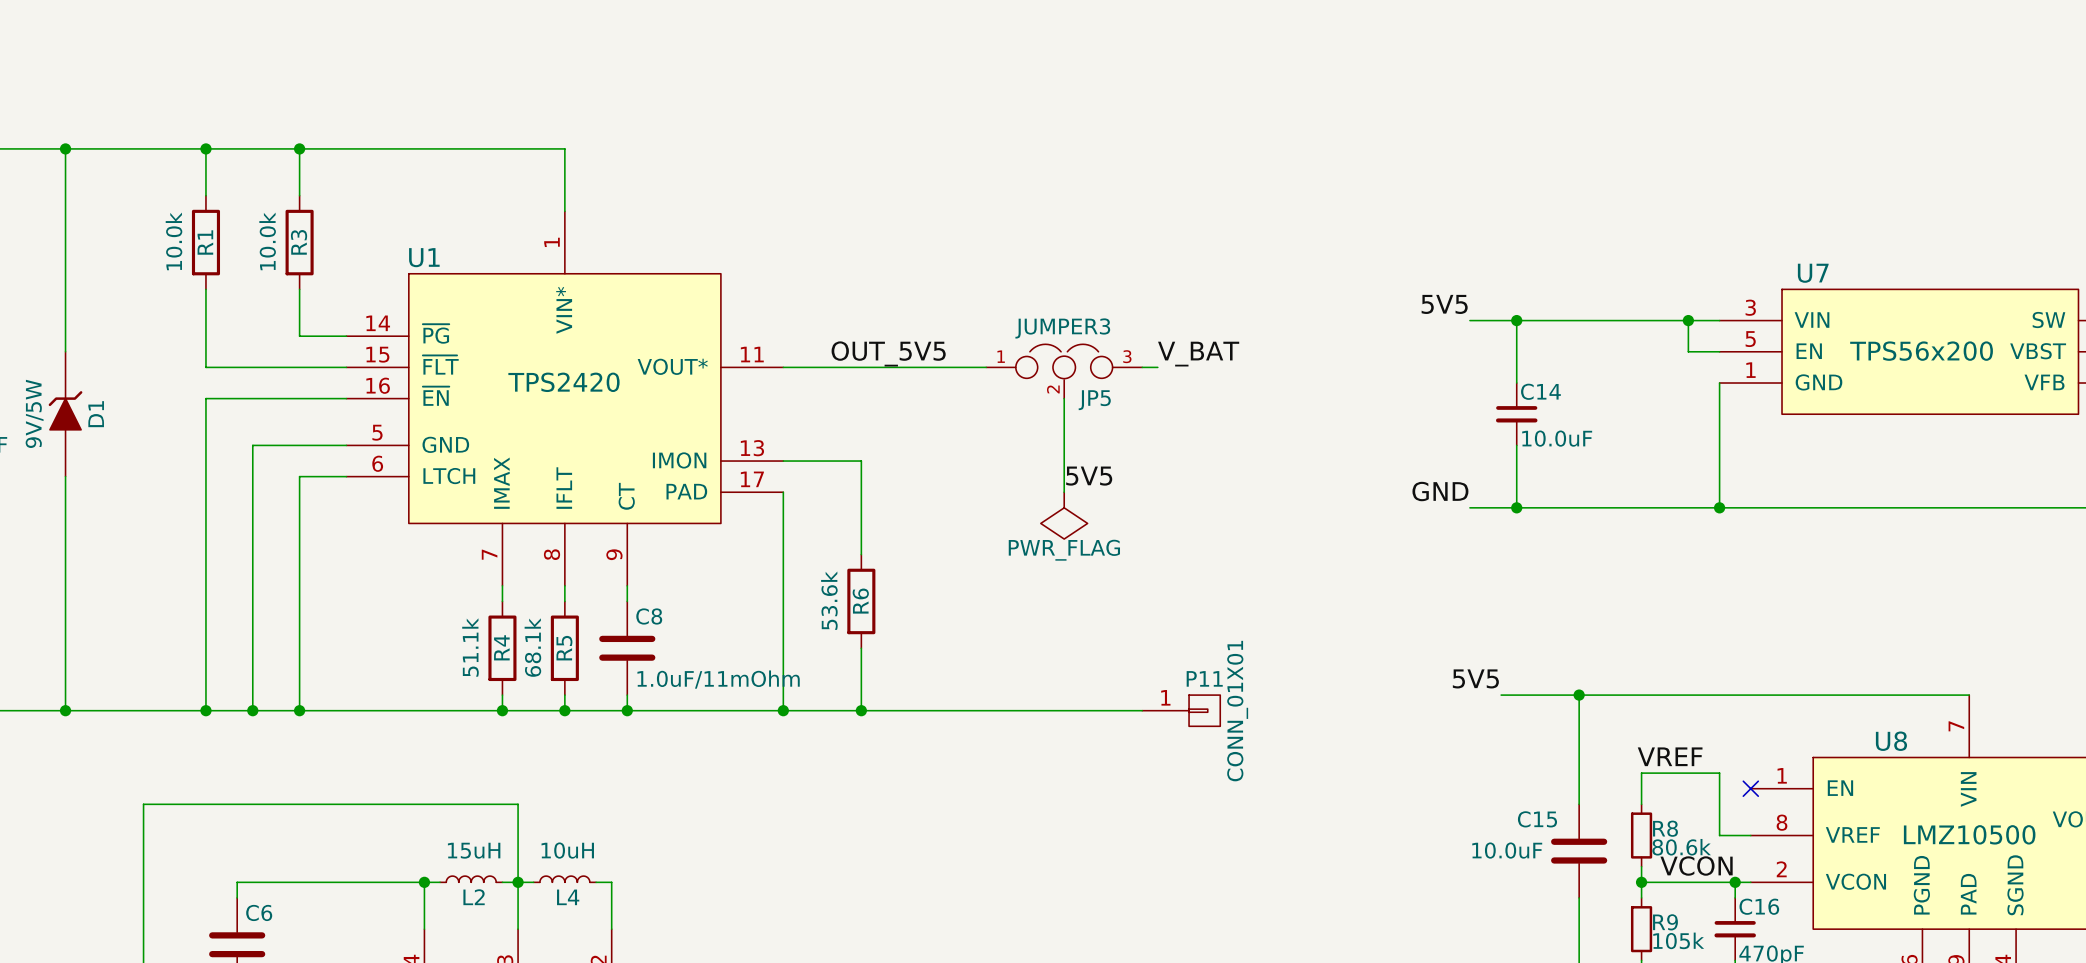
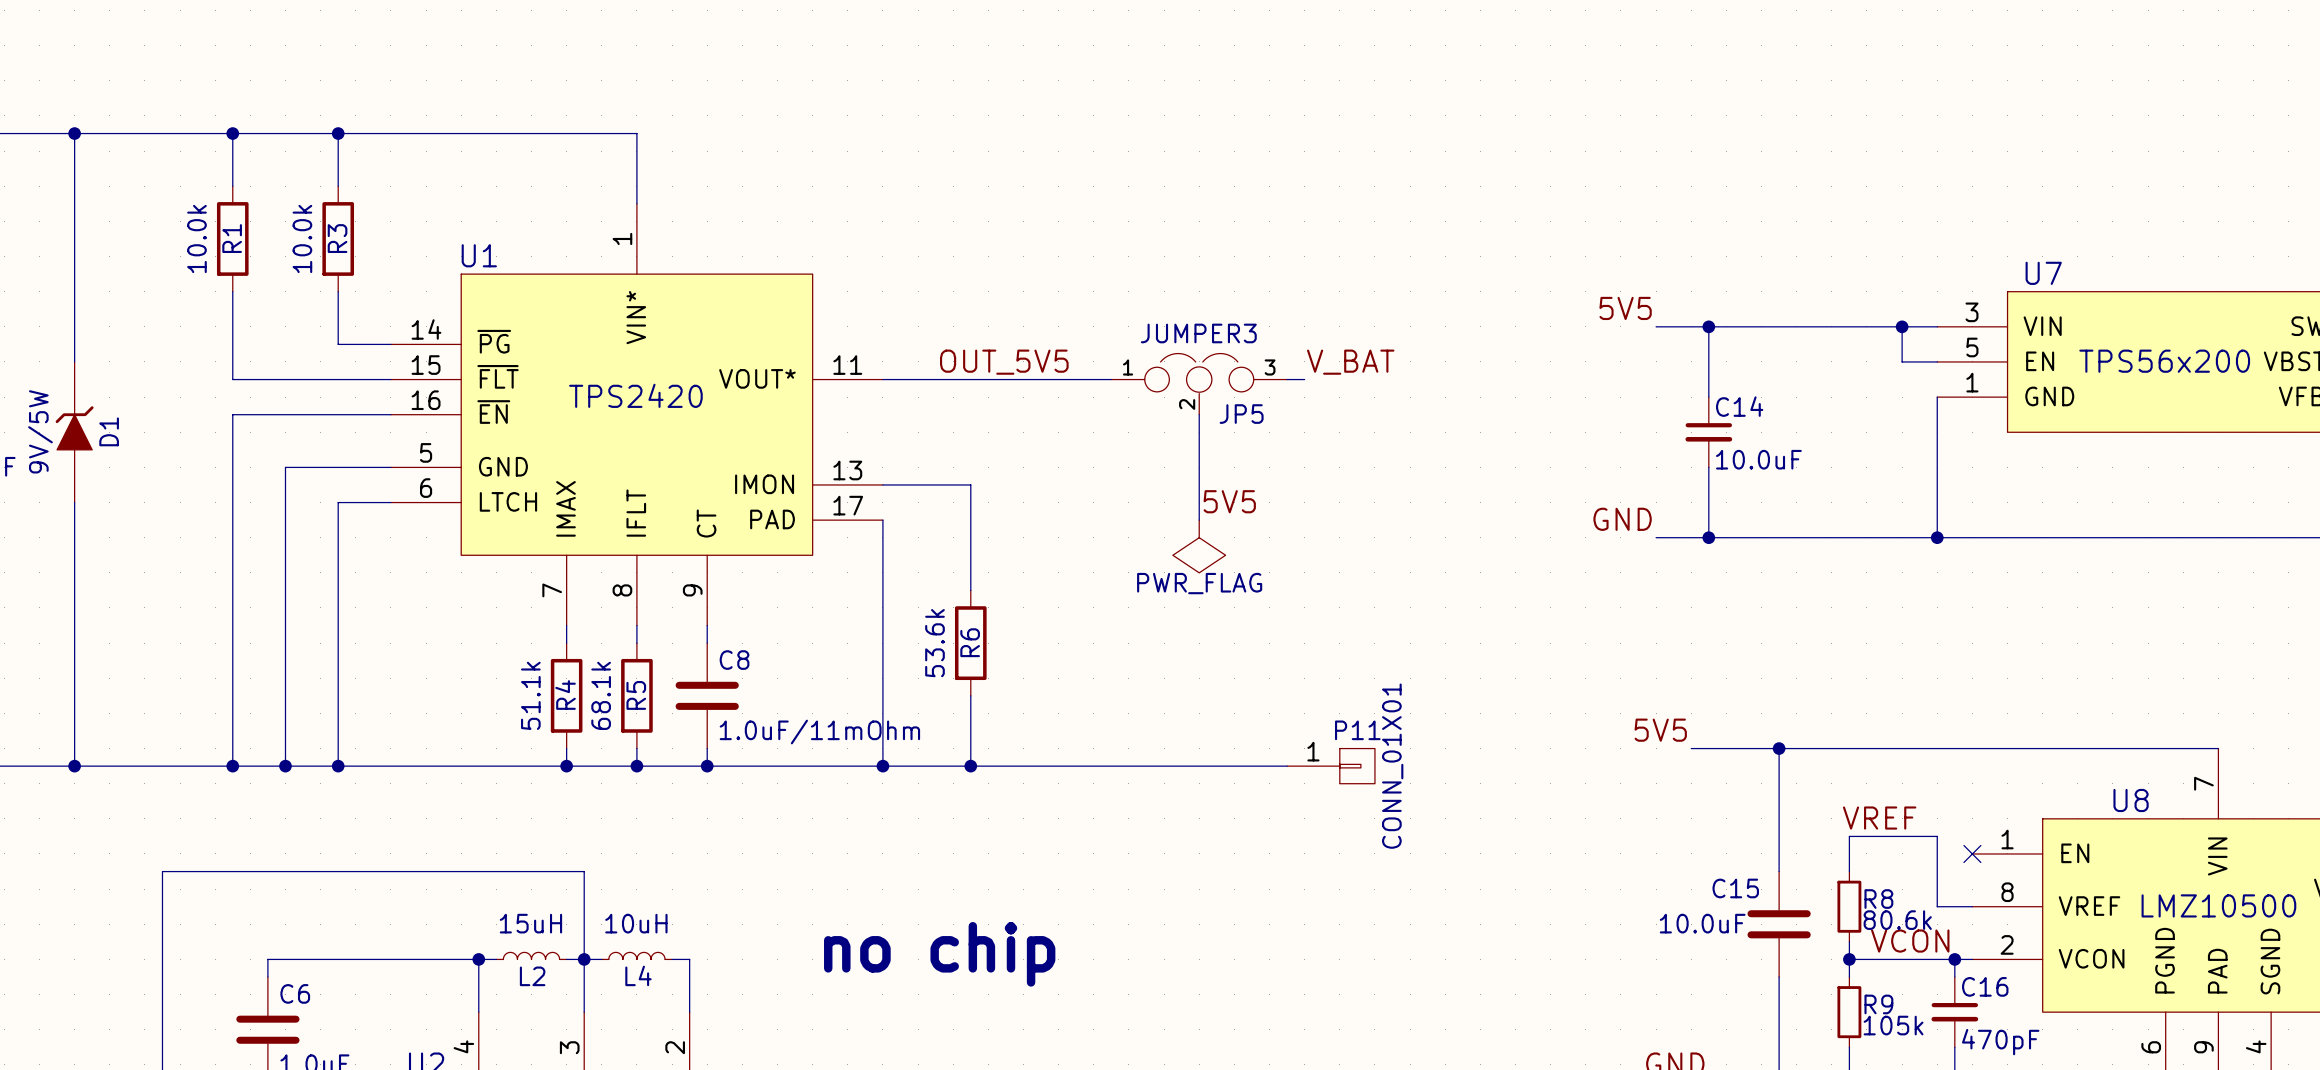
text: none -> no chip (939, 954)

